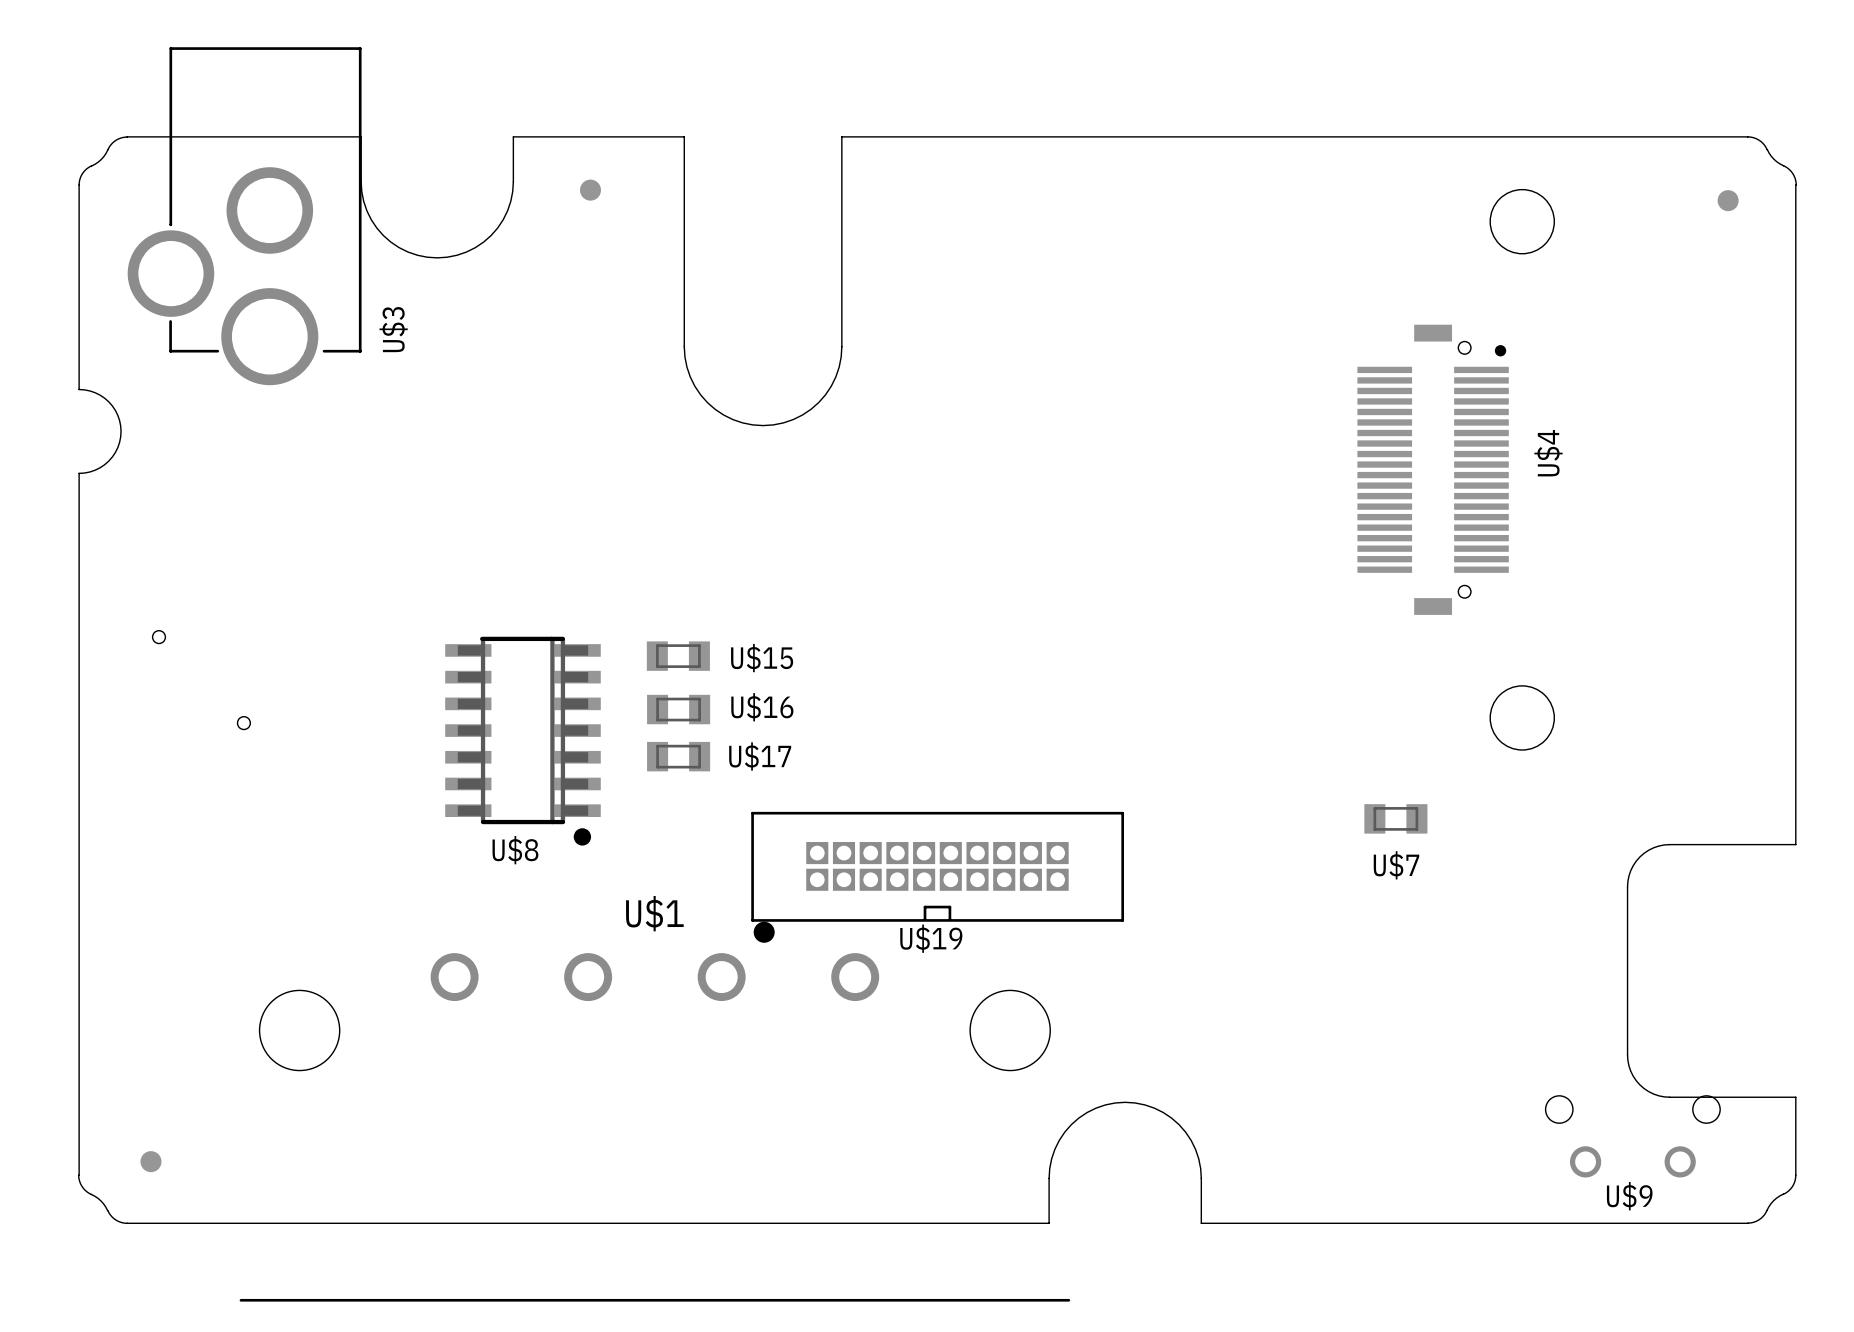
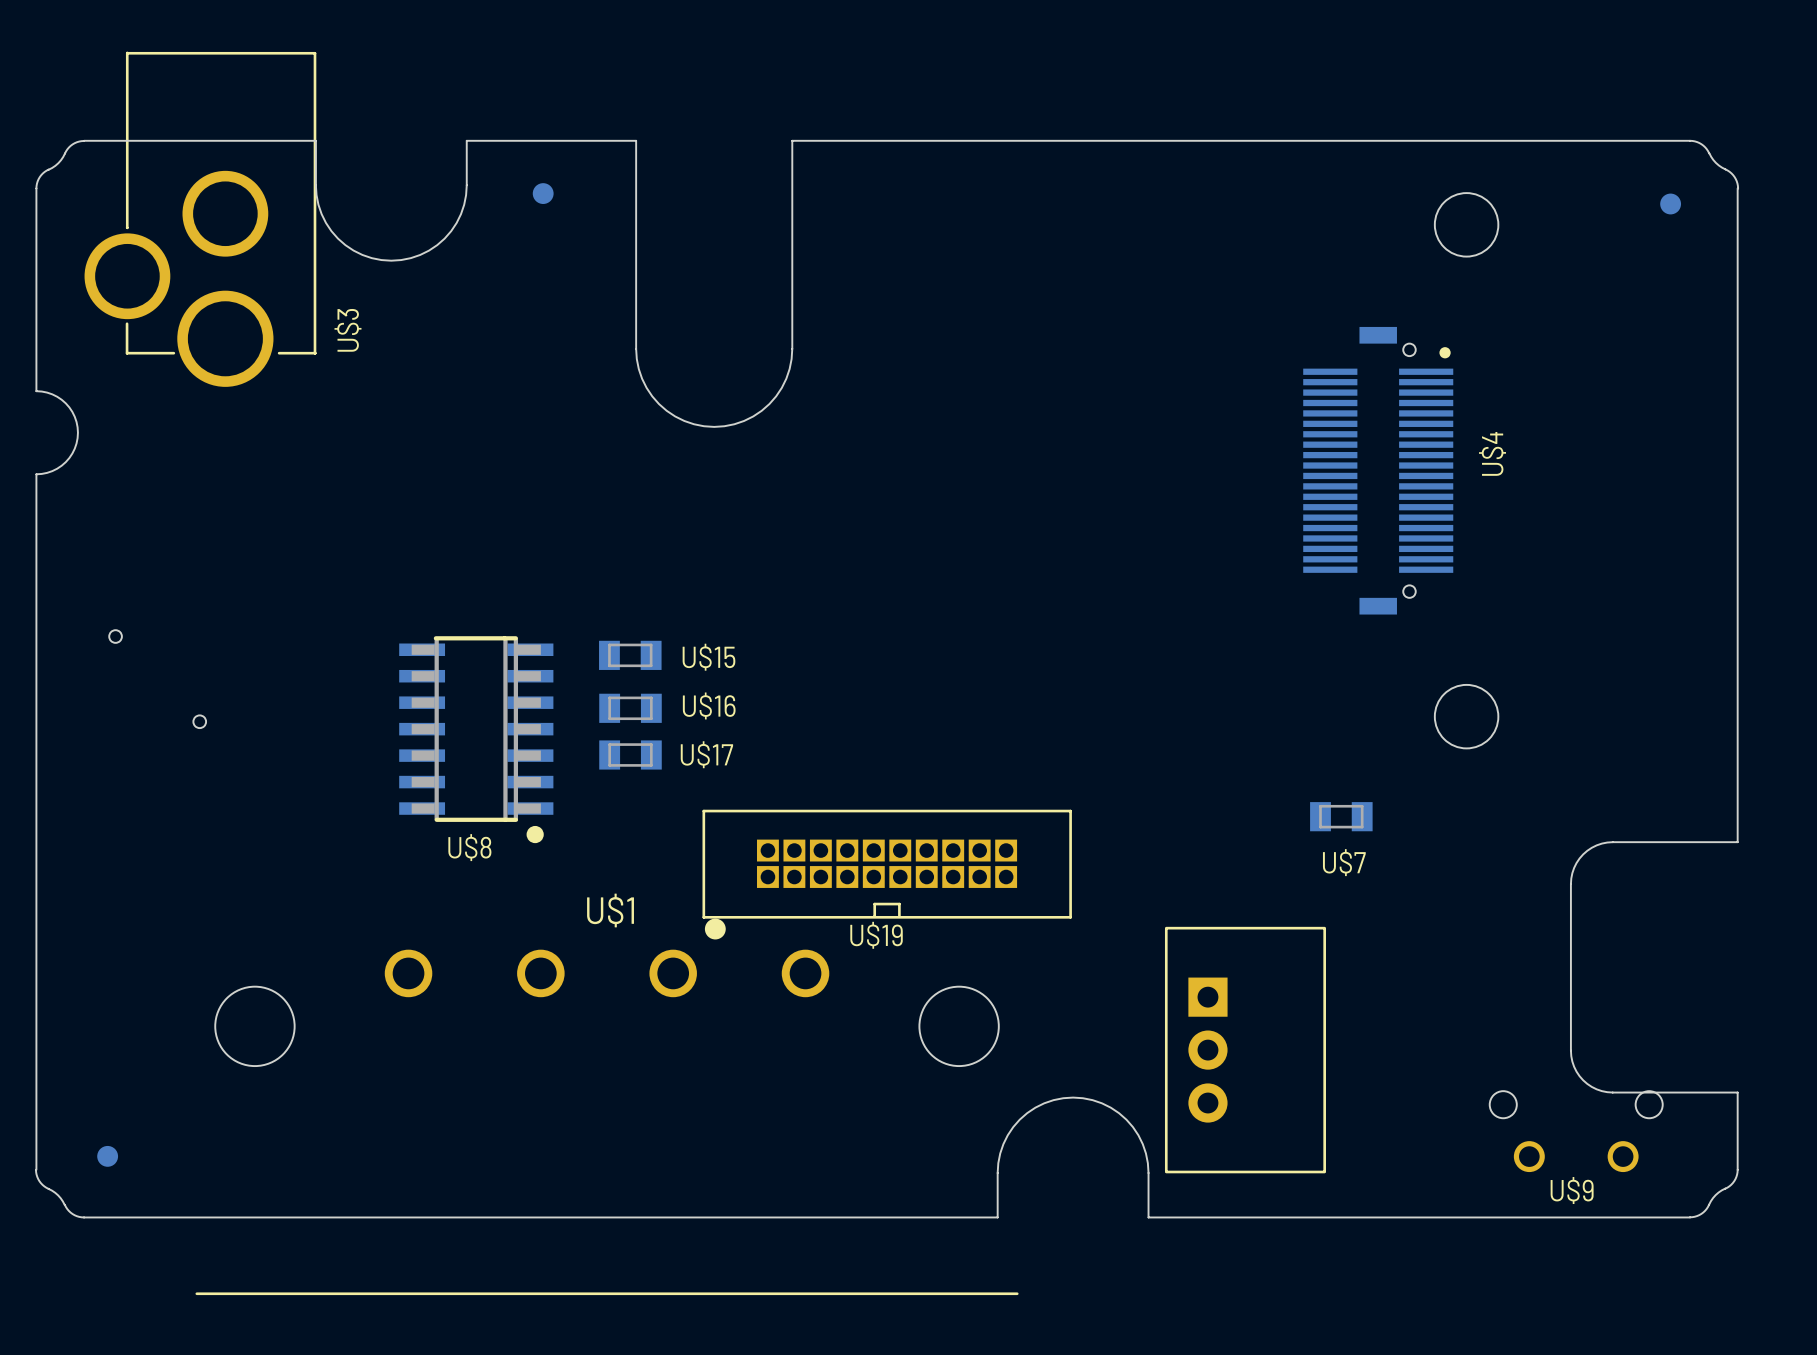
part: none -> (1245, 1050)

